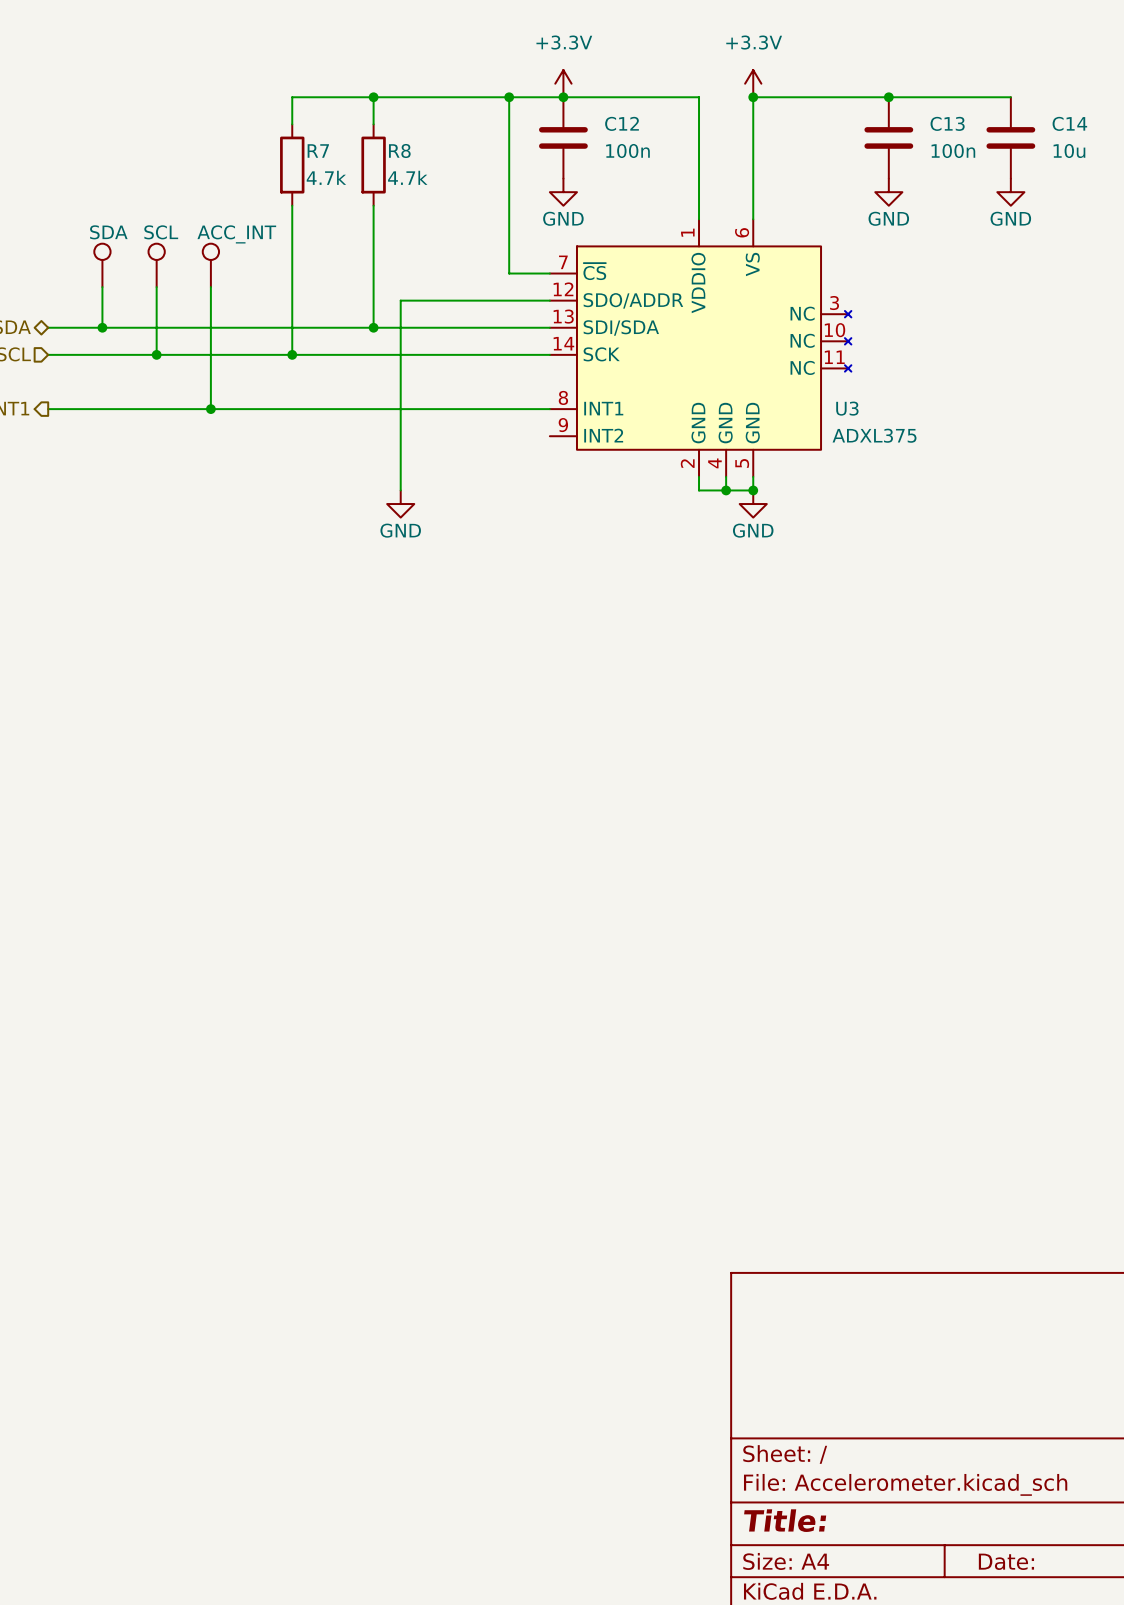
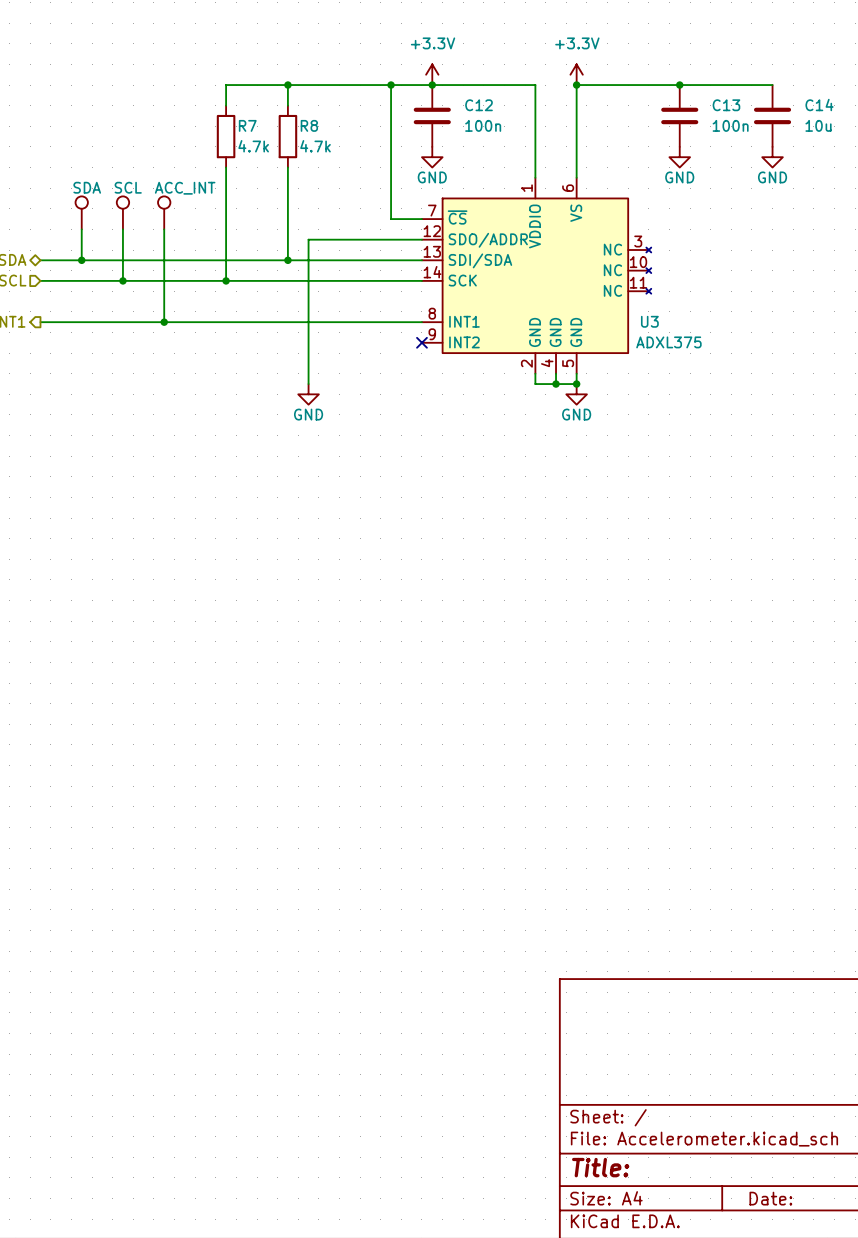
no-connect mark: none -> (421, 342)

